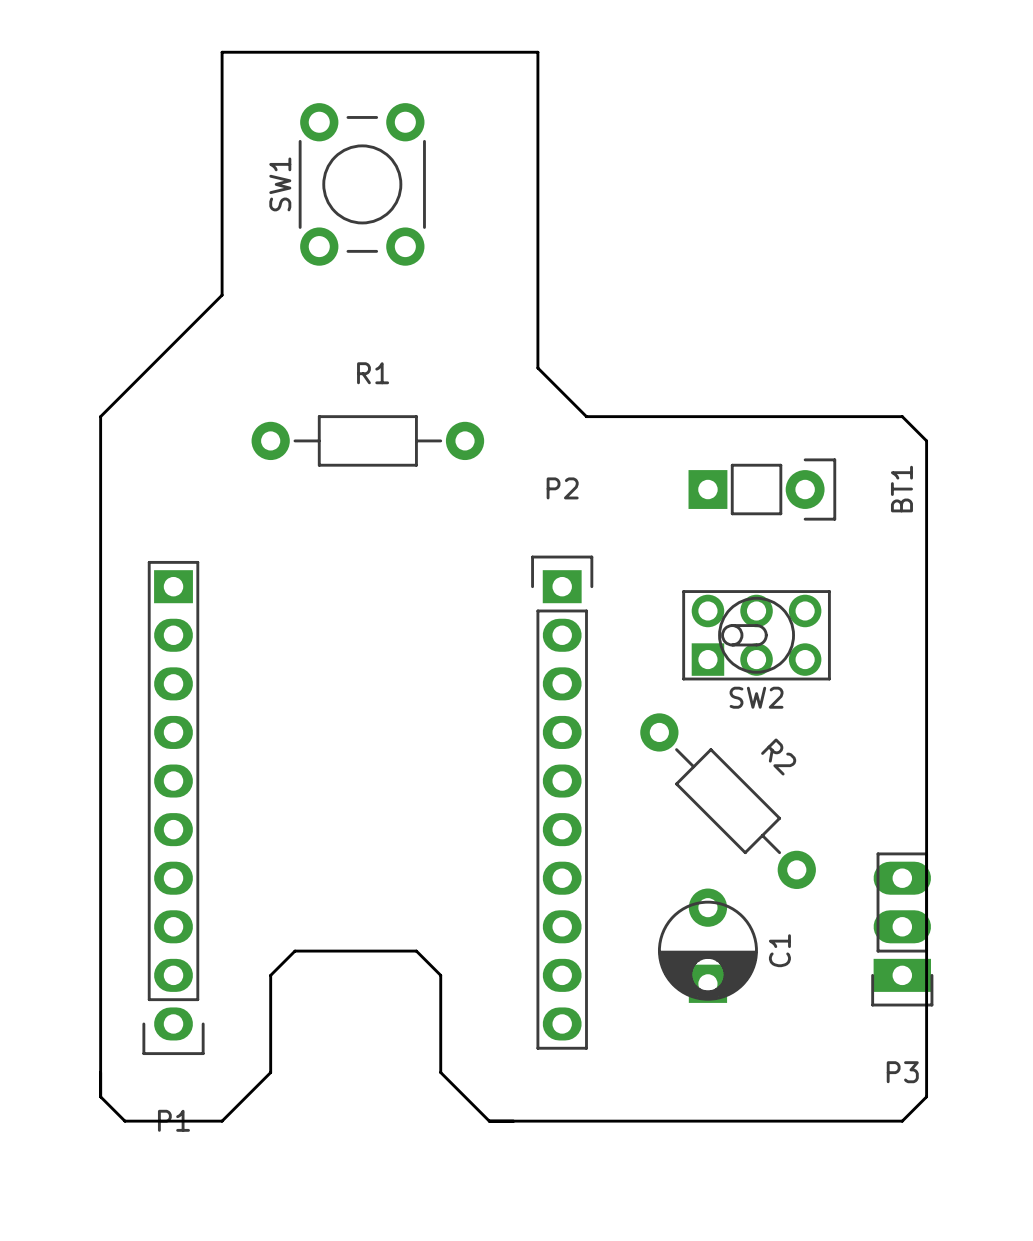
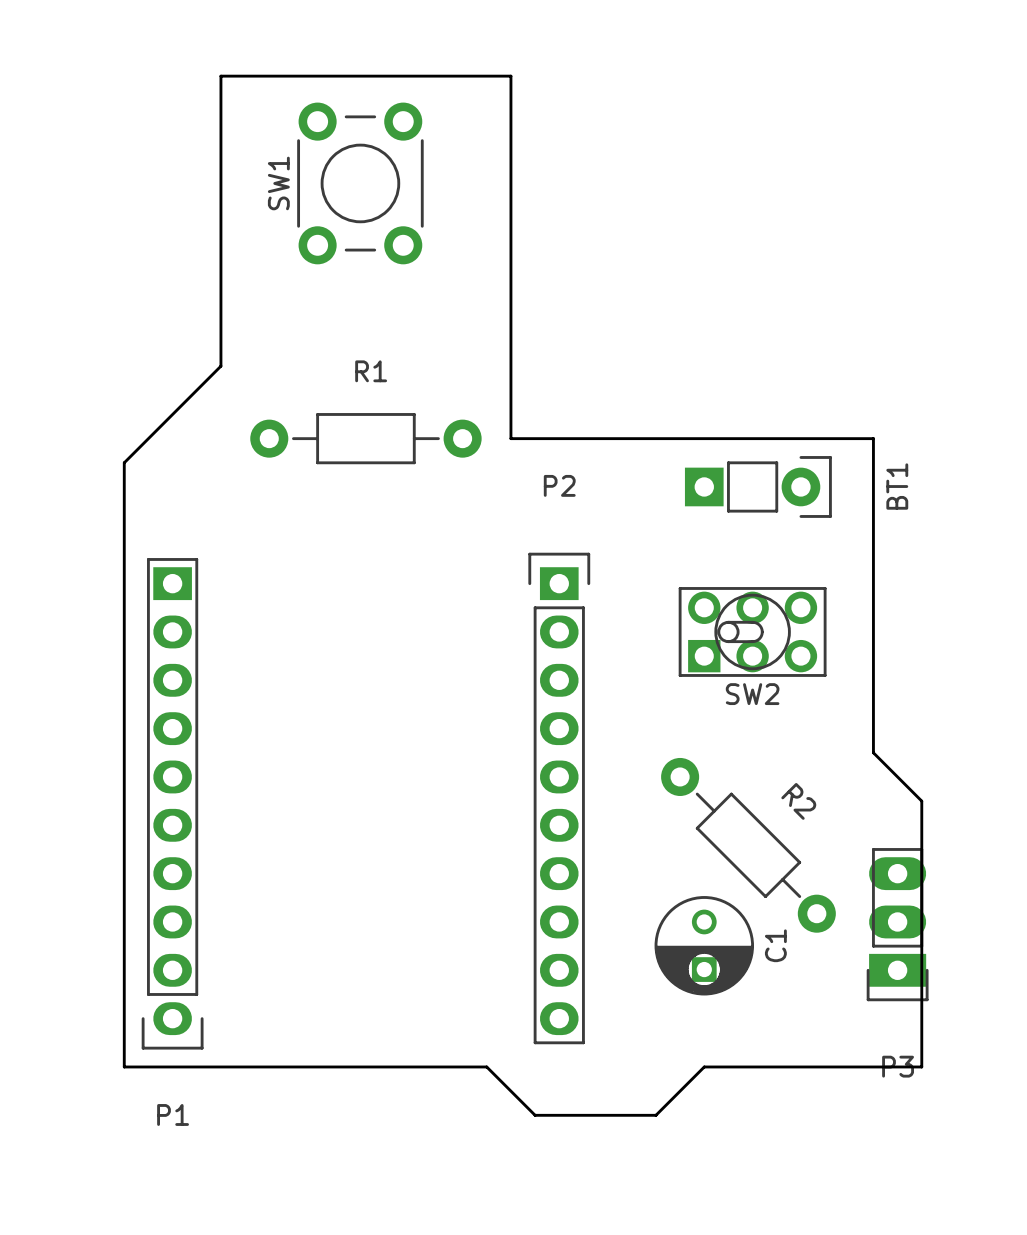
board edge: (222, 76) (222, 52) (537, 52) (537, 368) (586, 416) (902, 416) (926, 440) (926, 805) -> (220, 76) (510, 76) (510, 438) (873, 438) (873, 752) (921, 801)
board edge: (222, 295) (100, 416) (100, 1096) (124, 1121) (222, 1121) (270, 1072) (270, 975) (294, 951) (416, 951) (440, 975) (440, 1072) (489, 1121) (537, 1121) -> (220, 293) (220, 366) (124, 462) (124, 1066) (486, 1066) (535, 1115)
R2 position: (728, 801) -> (748, 845)
C1 footprint: [657, 888, 758, 1003] -> [654, 896, 754, 996]
board edge: (926, 1072) (926, 1096) (902, 1121) (659, 1121) -> (921, 1066) (704, 1066) (655, 1115)

